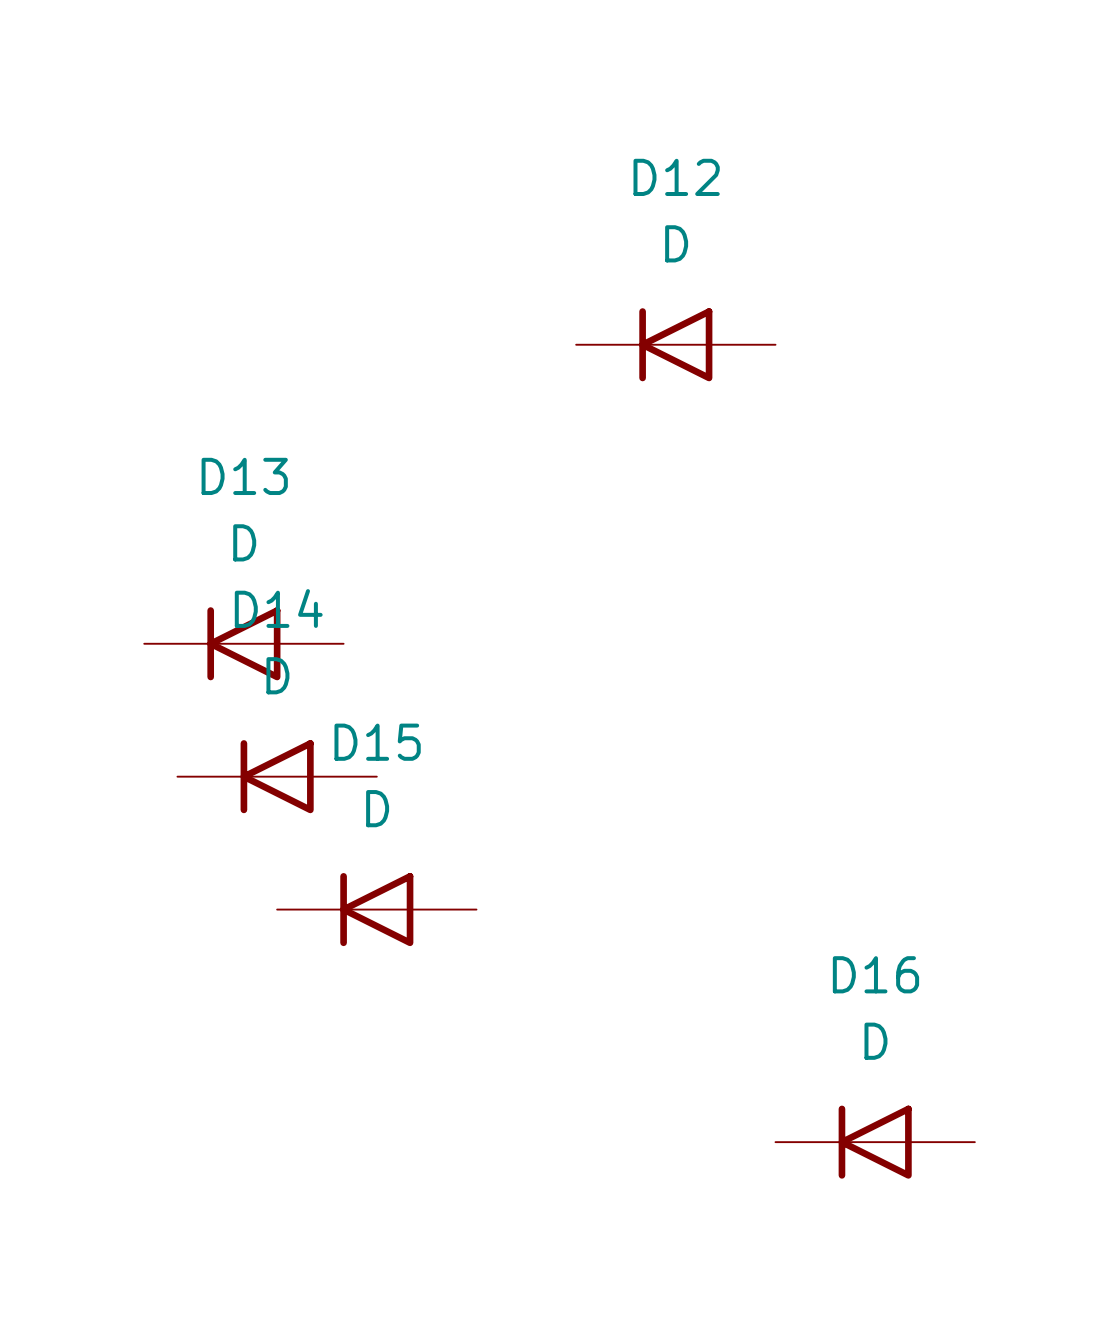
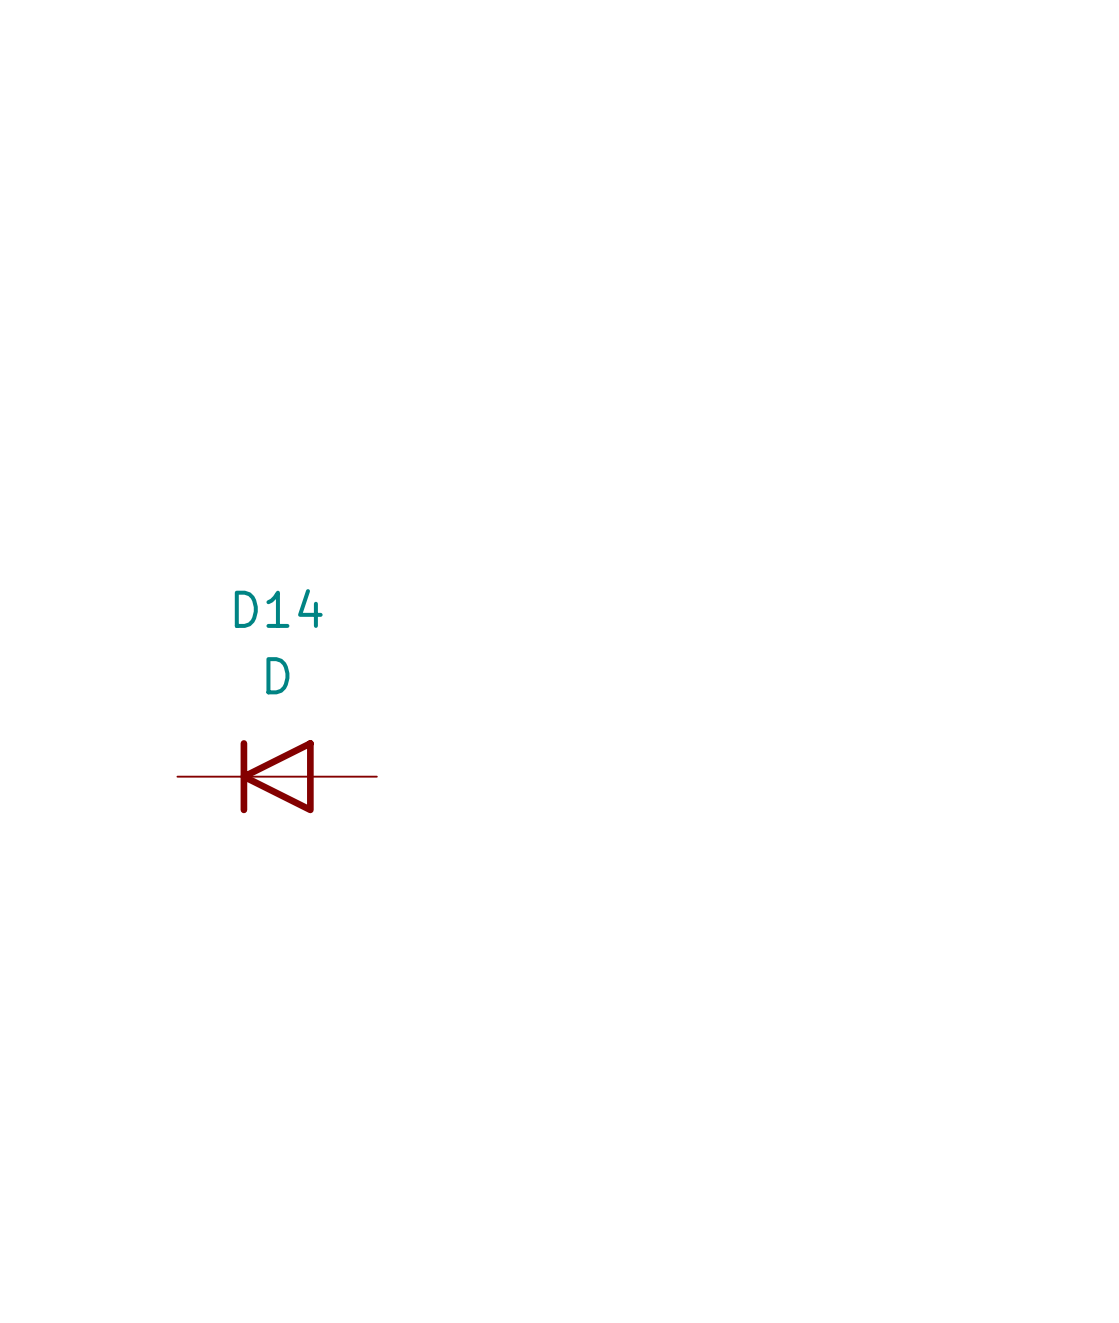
D12: D (675, 344) -> none
D13: D (243, 643) -> none
D15: D (376, 909) -> none
D16: D (875, 1142) -> none

